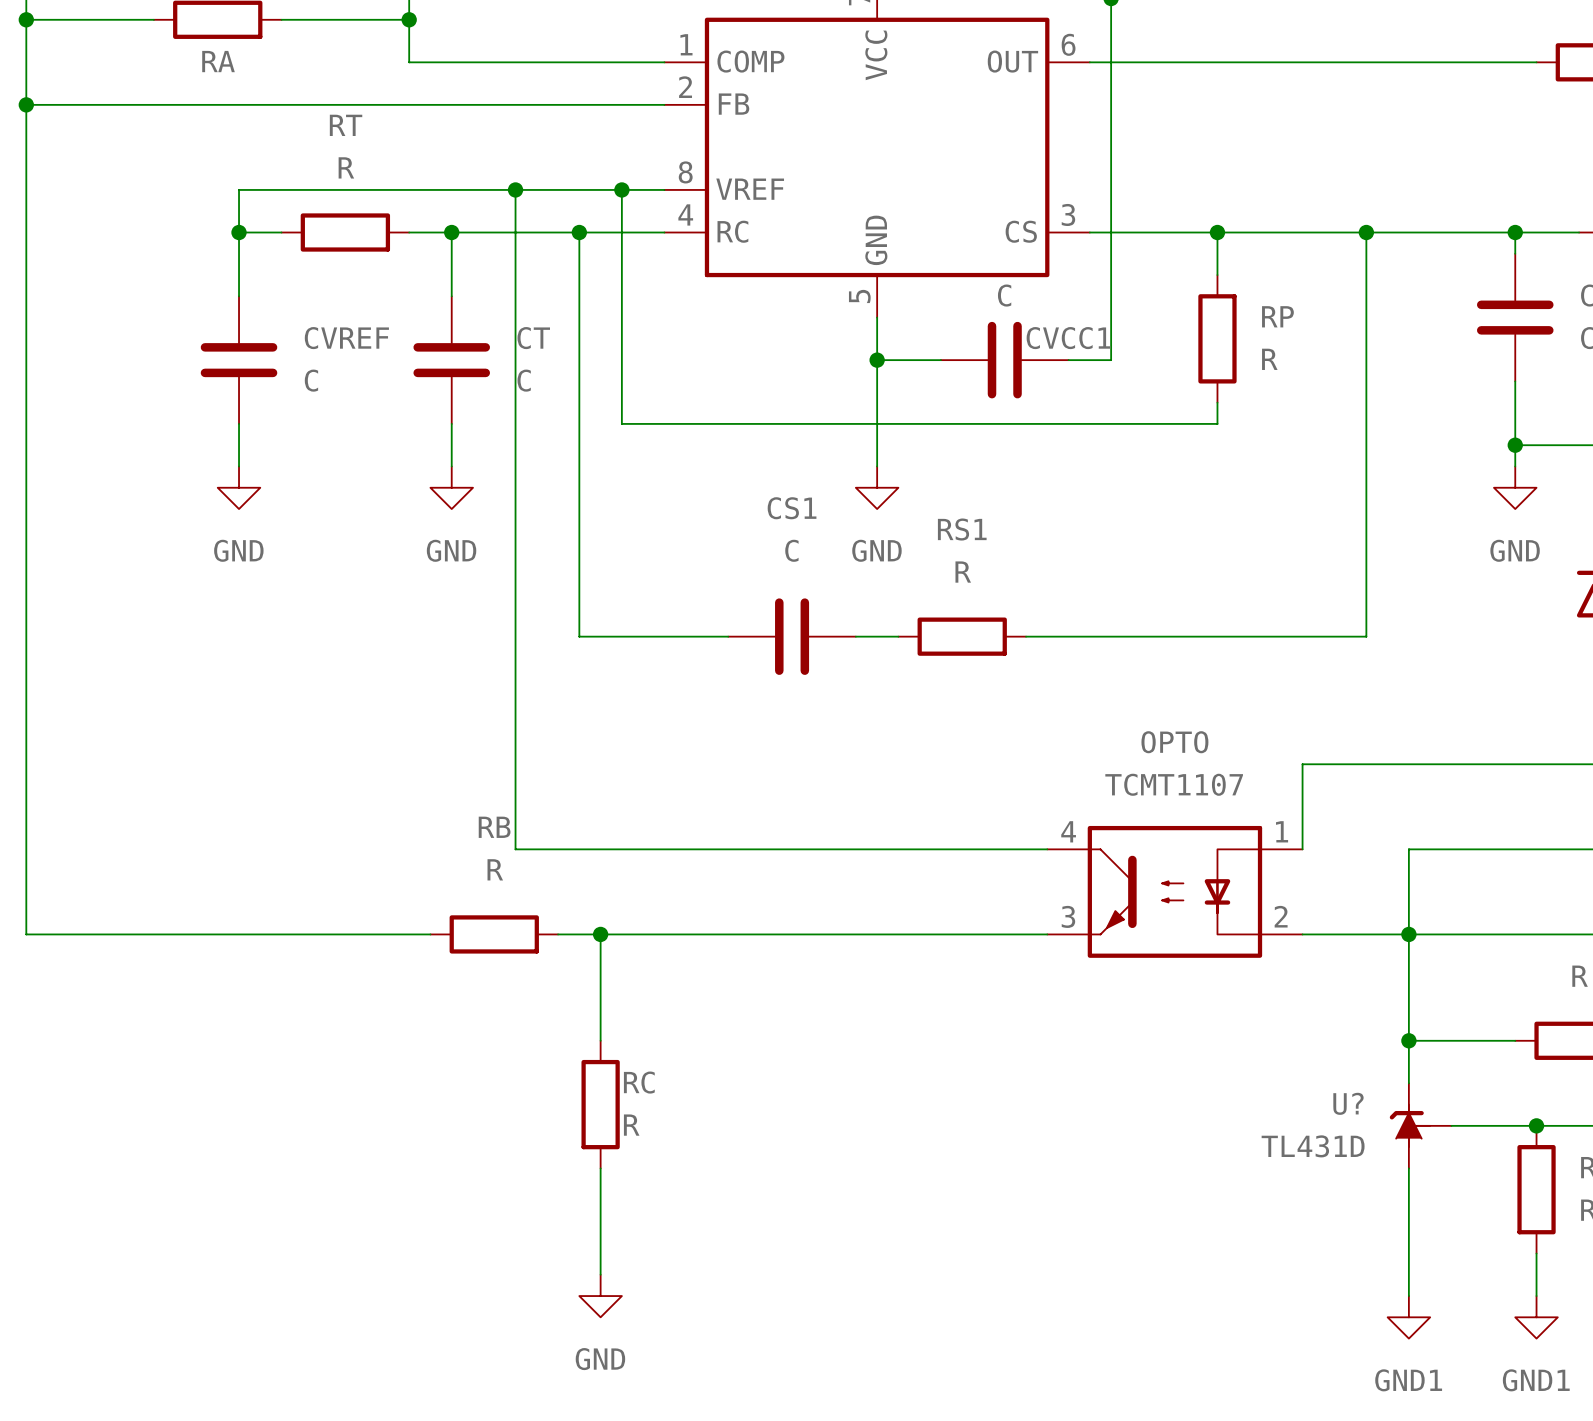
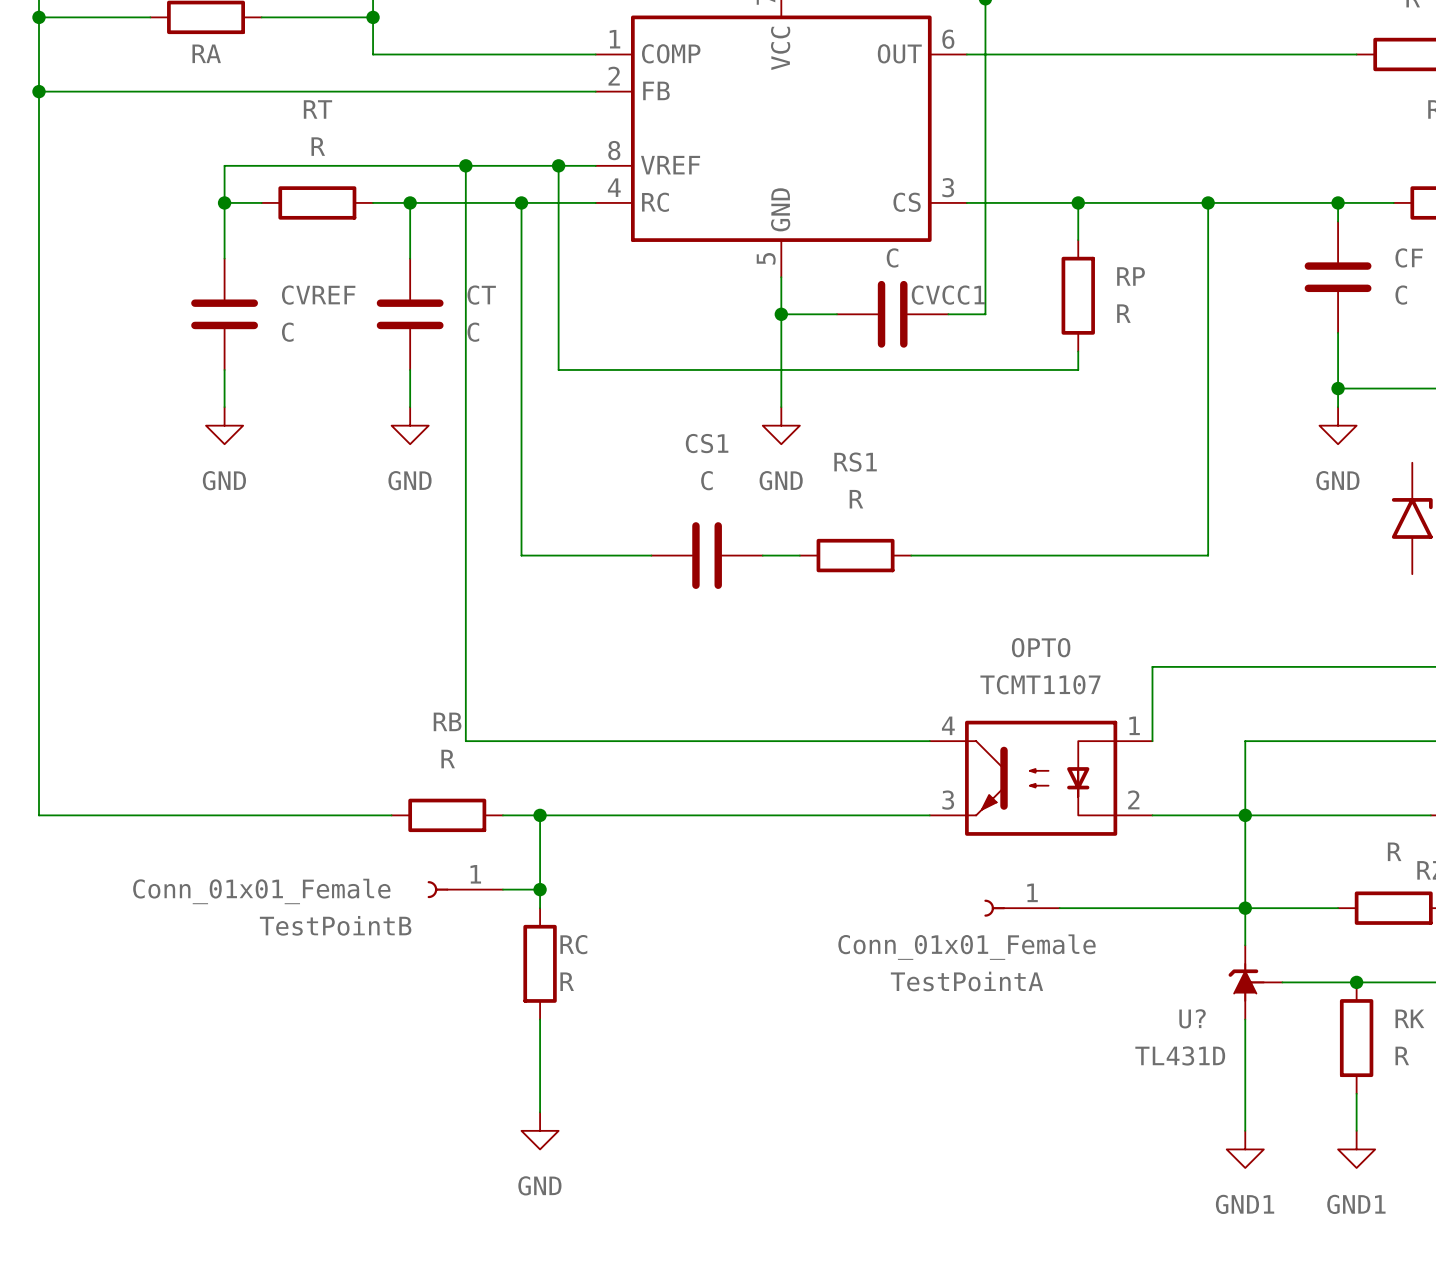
TestPointB: none -> Conn_01x01_Female (465, 889)
wire: none -> (502, 889) (540, 889)
junction: none -> (540, 889)
TestPointA: none -> Conn_01x01_Female (1022, 908)
wire: none -> (1059, 908) (1245, 908)
U? name position: U? (1348, 1103) -> U? (1192, 1018)
U? value position: TL431D (1313, 1146) -> TL431D (1180, 1055)

